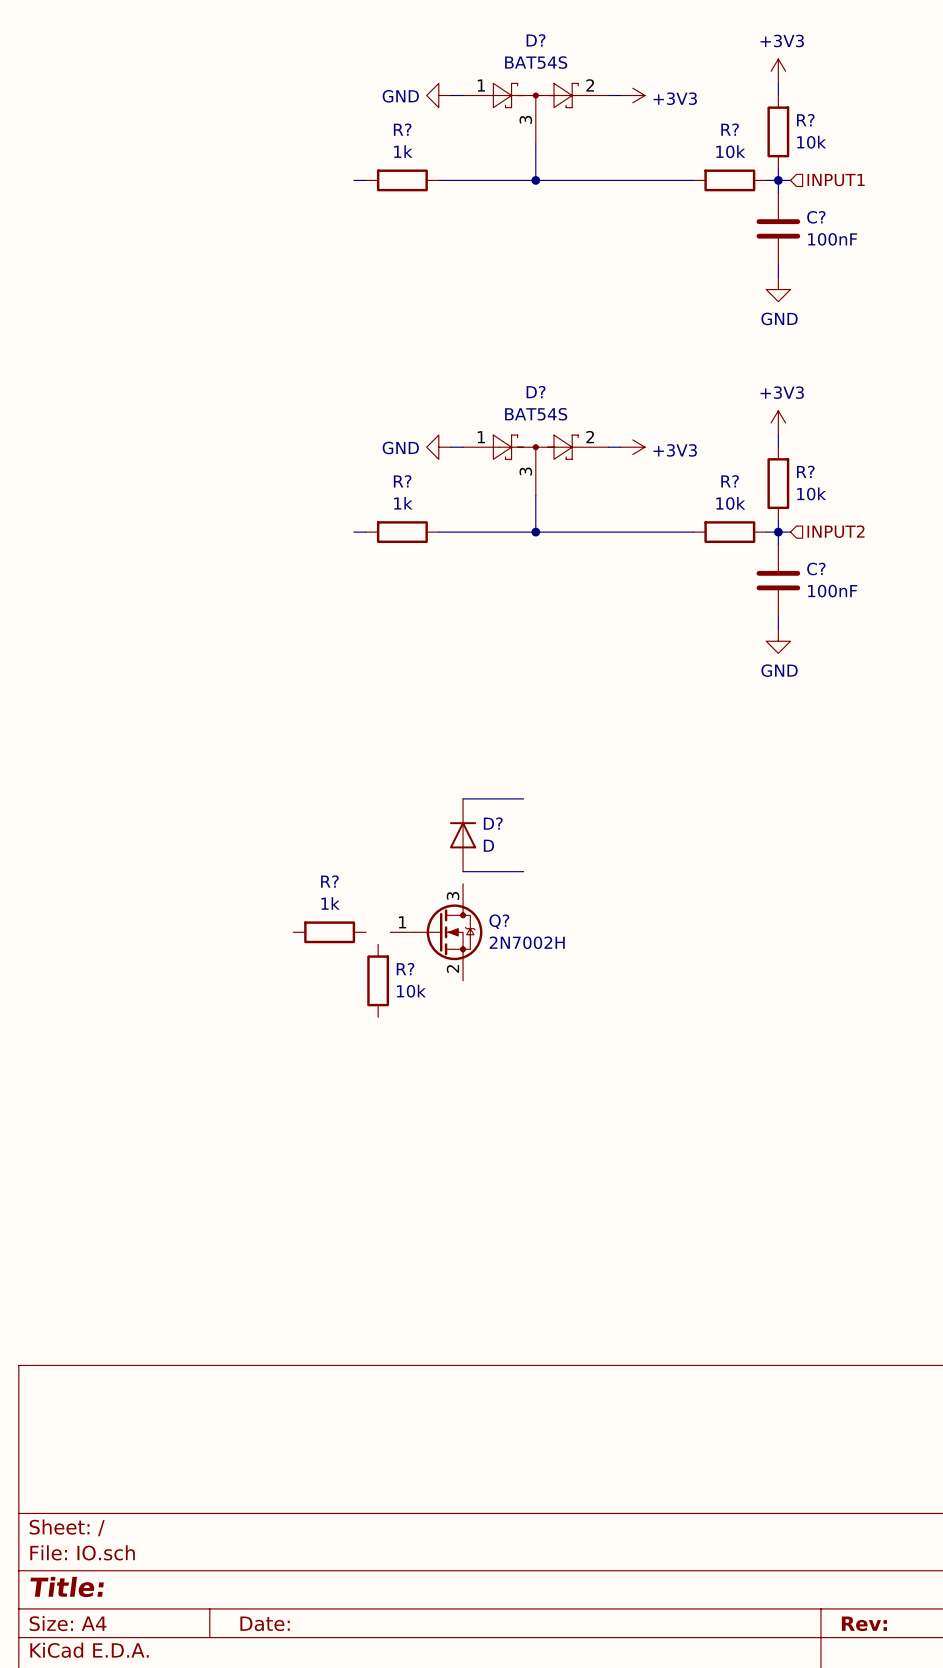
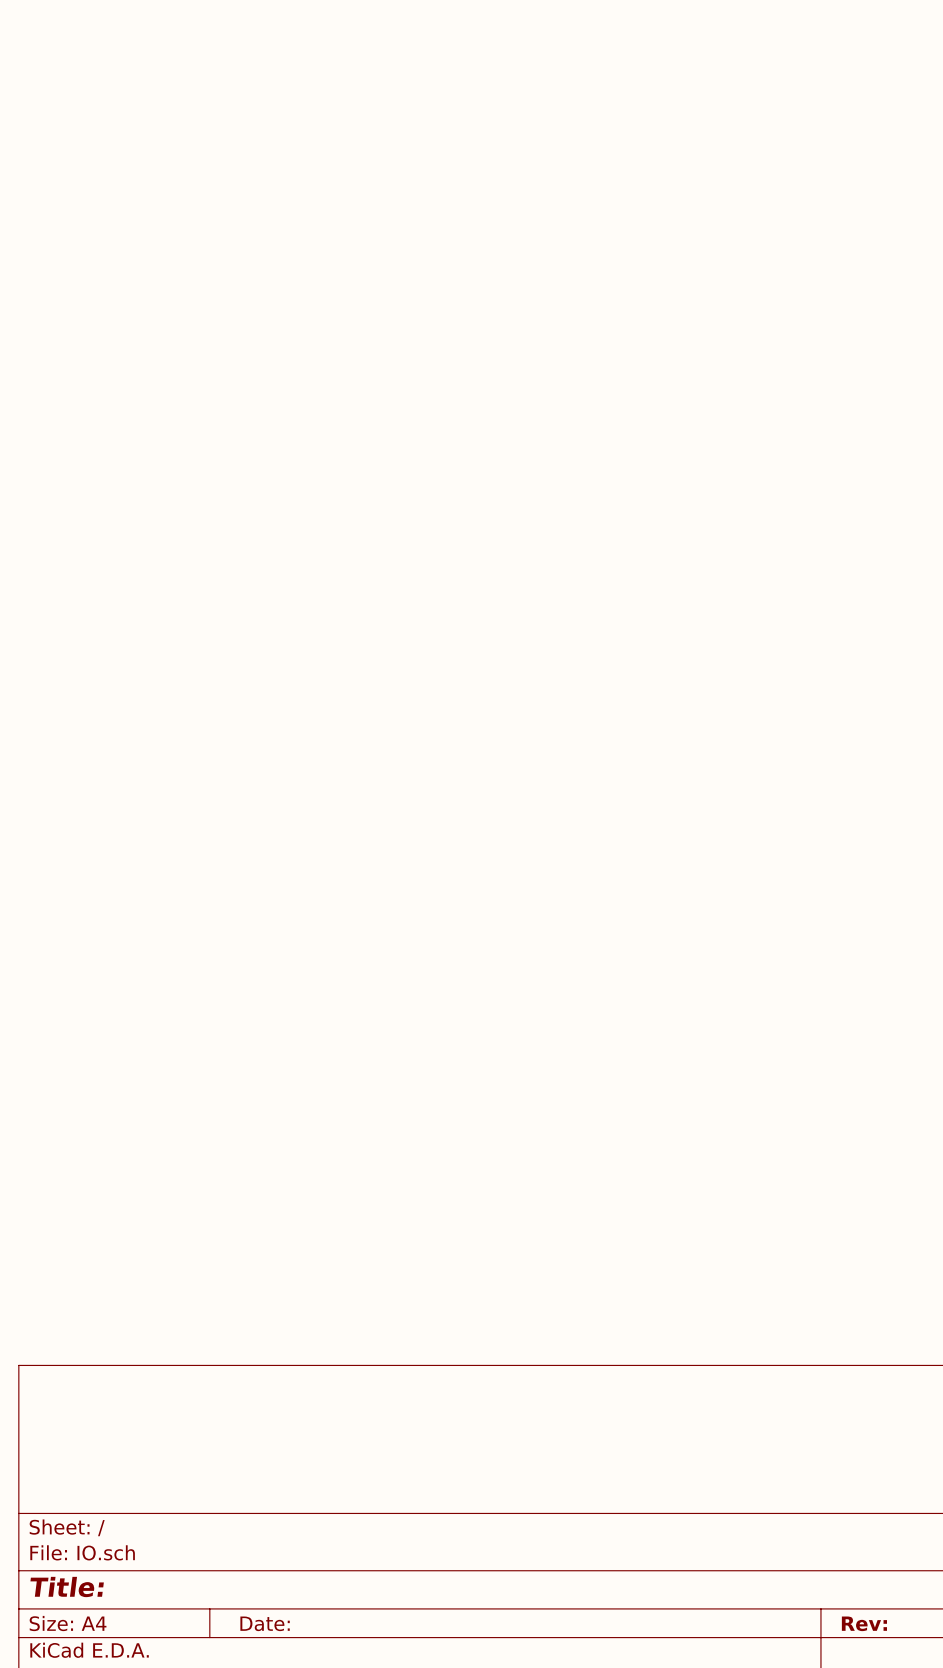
power symbol: +3V3 (778, 71) -> none
wire: (778, 83) (778, 95) -> none
power symbol: GND (438, 95) -> none
wire: (450, 95) (463, 95) -> none
wire: (608, 95) (620, 95) -> none
power symbol: +3V3 (632, 95) -> none
D?: BAT54S (535, 113) -> none
R?: 10k (778, 131) -> none
wire: (535, 144) (535, 180) -> none
wire: (778, 168) (778, 192) -> none
wire: (353, 180) (366, 180) -> none
R?: 1k (402, 180) -> none
wire: (438, 180) (693, 180) -> none
junction: (535, 180) -> none
R?: 10k (729, 180) -> none
wire: (766, 180) (790, 180) -> none
junction: (778, 180) -> none
hierarchical label: INPUT1 (836, 180) -> none
C?: 100nF (778, 228) -> none
wire: (778, 265) (778, 277) -> none
power symbol: GND (778, 289) -> none
power symbol: +3V3 (778, 422) -> none
wire: (778, 435) (778, 447) -> none
power symbol: GND (438, 447) -> none
wire: (450, 447) (463, 447) -> none
wire: (608, 447) (620, 447) -> none
power symbol: +3V3 (632, 447) -> none
D?: BAT54S (535, 465) -> none
R?: 10k (778, 483) -> none
wire: (535, 495) (535, 532) -> none
wire: (778, 519) (778, 544) -> none
hierarchical label: INPUT2 (836, 531) -> none
wire: (353, 532) (366, 532) -> none
R?: 1k (402, 532) -> none
wire: (438, 532) (693, 532) -> none
junction: (535, 532) -> none
R?: 10k (729, 532) -> none
wire: (766, 532) (790, 532) -> none
junction: (778, 532) -> none
C?: 100nF (778, 580) -> none
wire: (778, 616) (778, 629) -> none
power symbol: GND (778, 641) -> none
wire: (463, 798) (523, 798) -> none
D?: D (463, 835) -> none
wire: (463, 871) (523, 871) -> none
R?: 1k (329, 932) -> none
Q?: 2N7002H (436, 932) -> none
R?: 10k (378, 980) -> none

